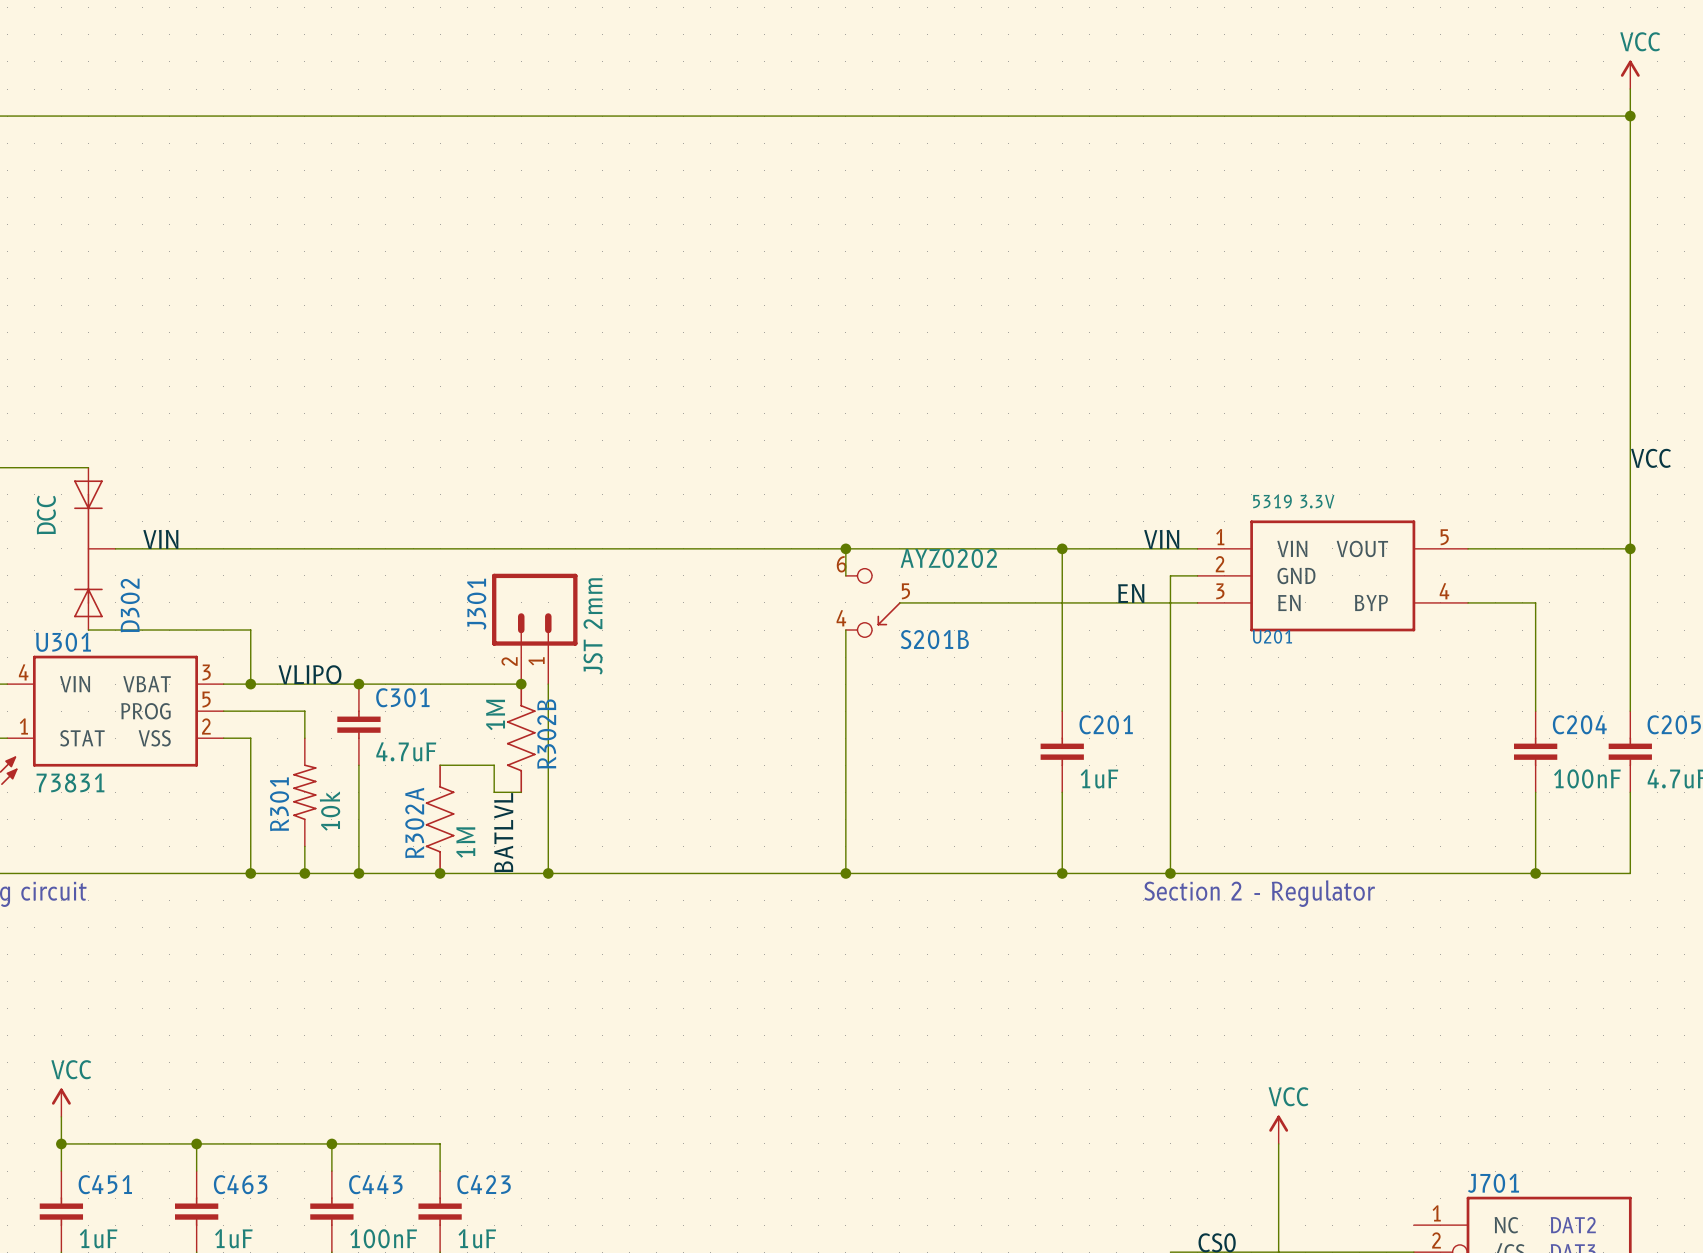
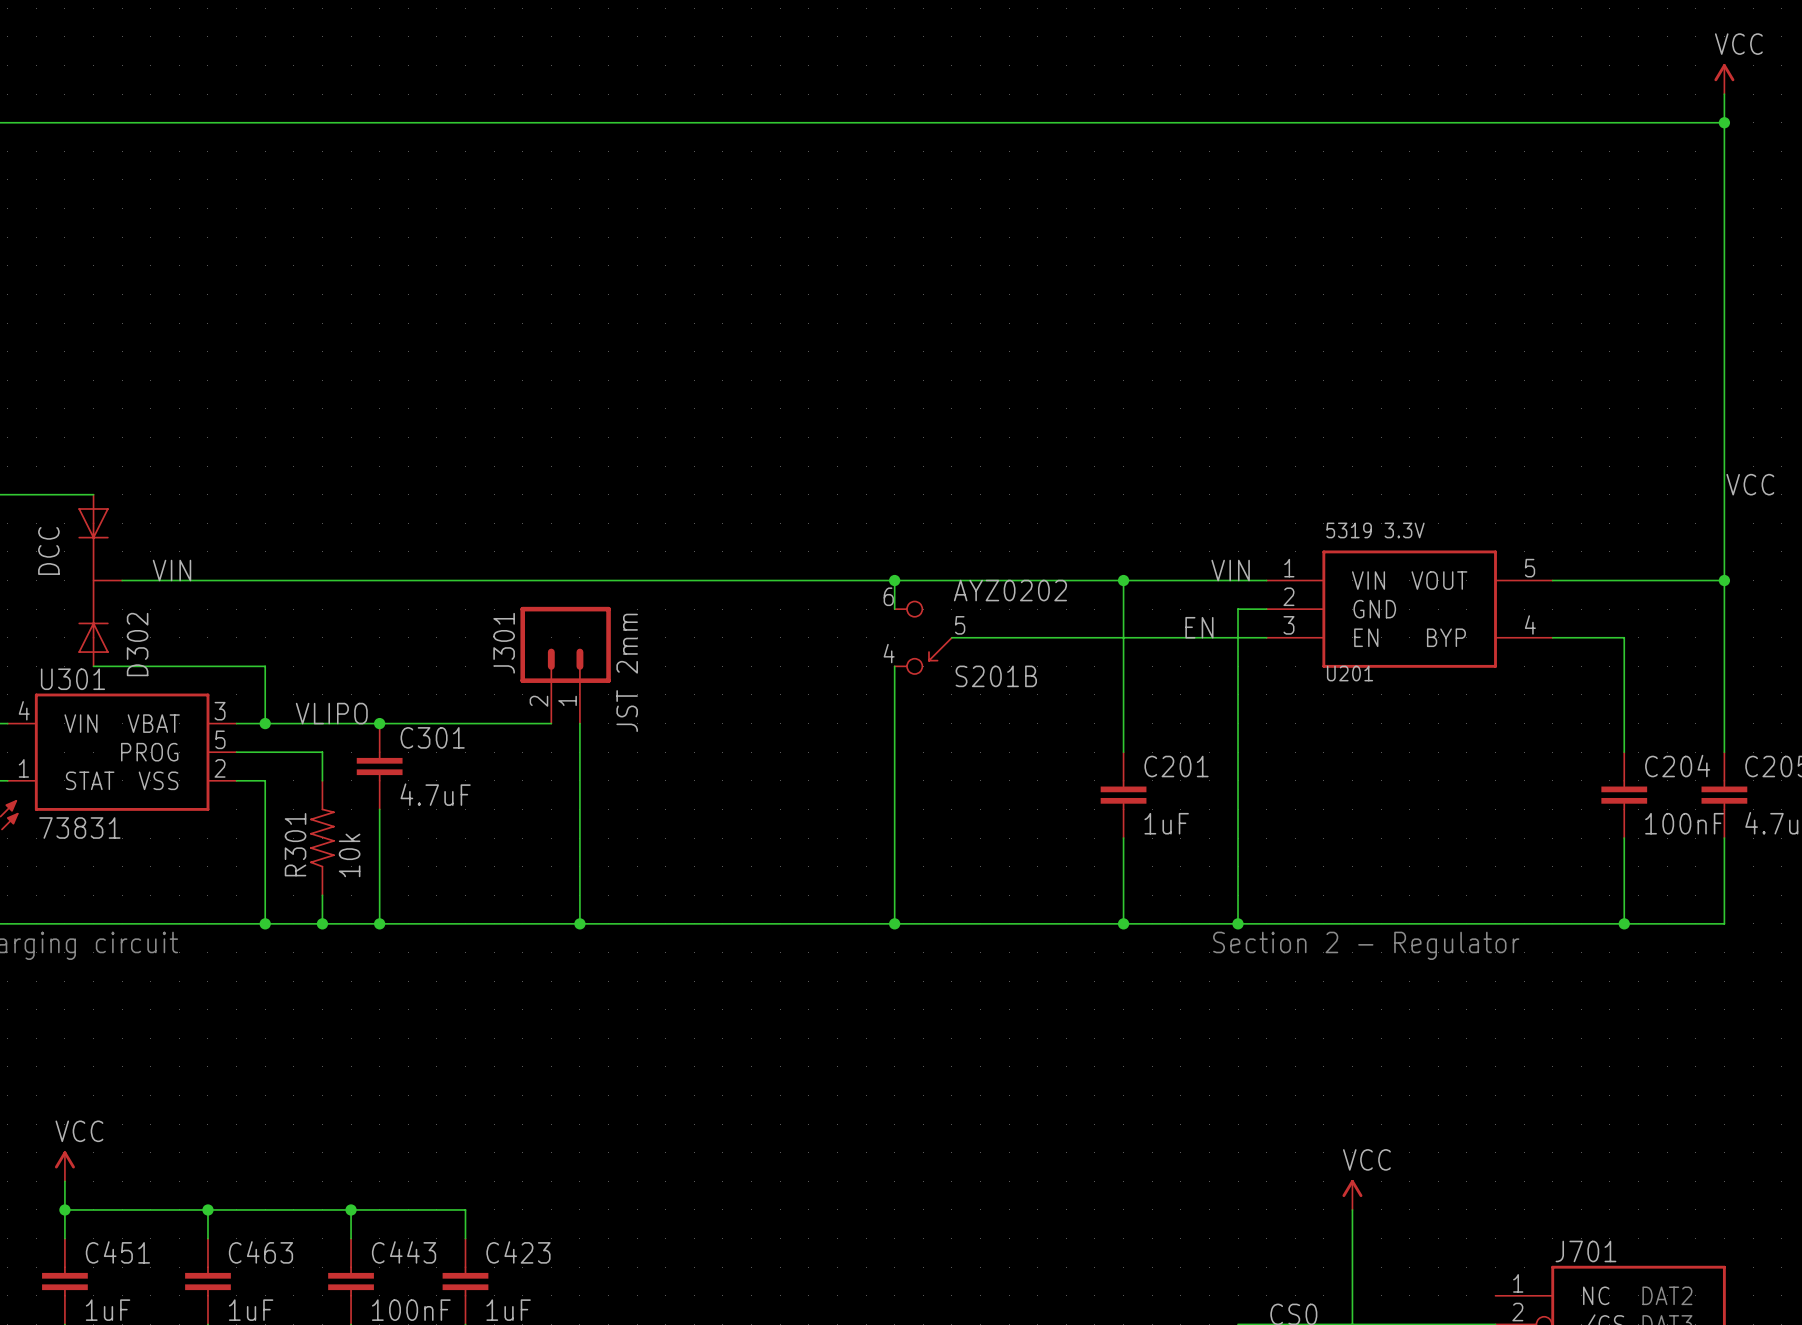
junction: (521, 684) -> none
R302B: 1M (521, 738) -> none
wire: (440, 765) (494, 765) (494, 792) (521, 792) -> none
R302A: 1M (440, 819) -> none
label: BATLVL (503, 832) -> none
junction: (440, 873) -> none

